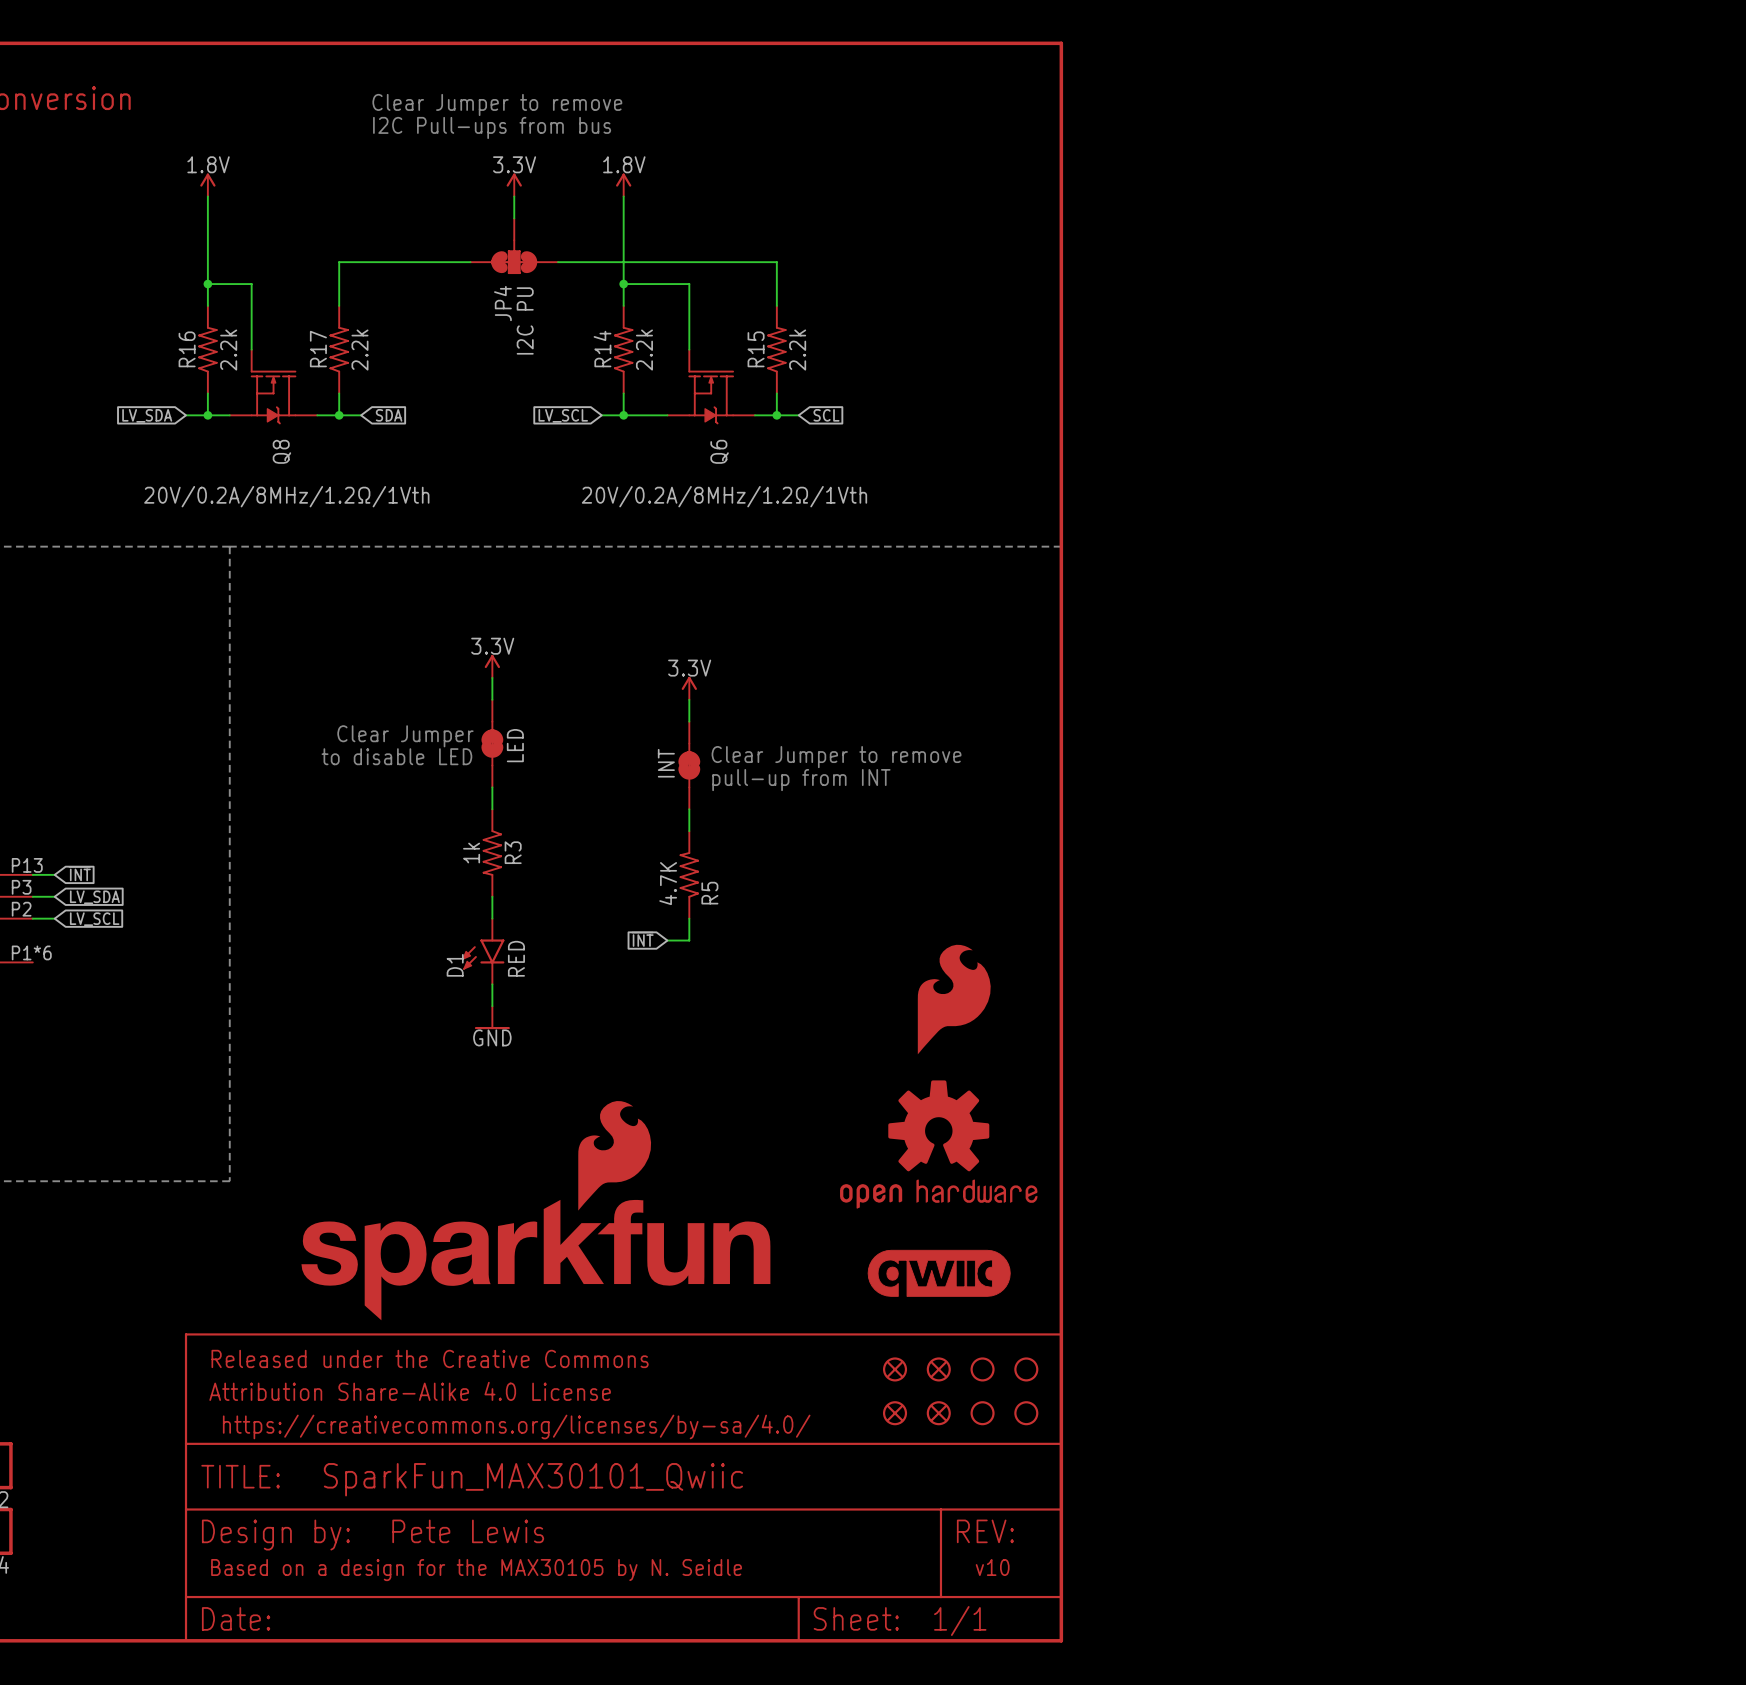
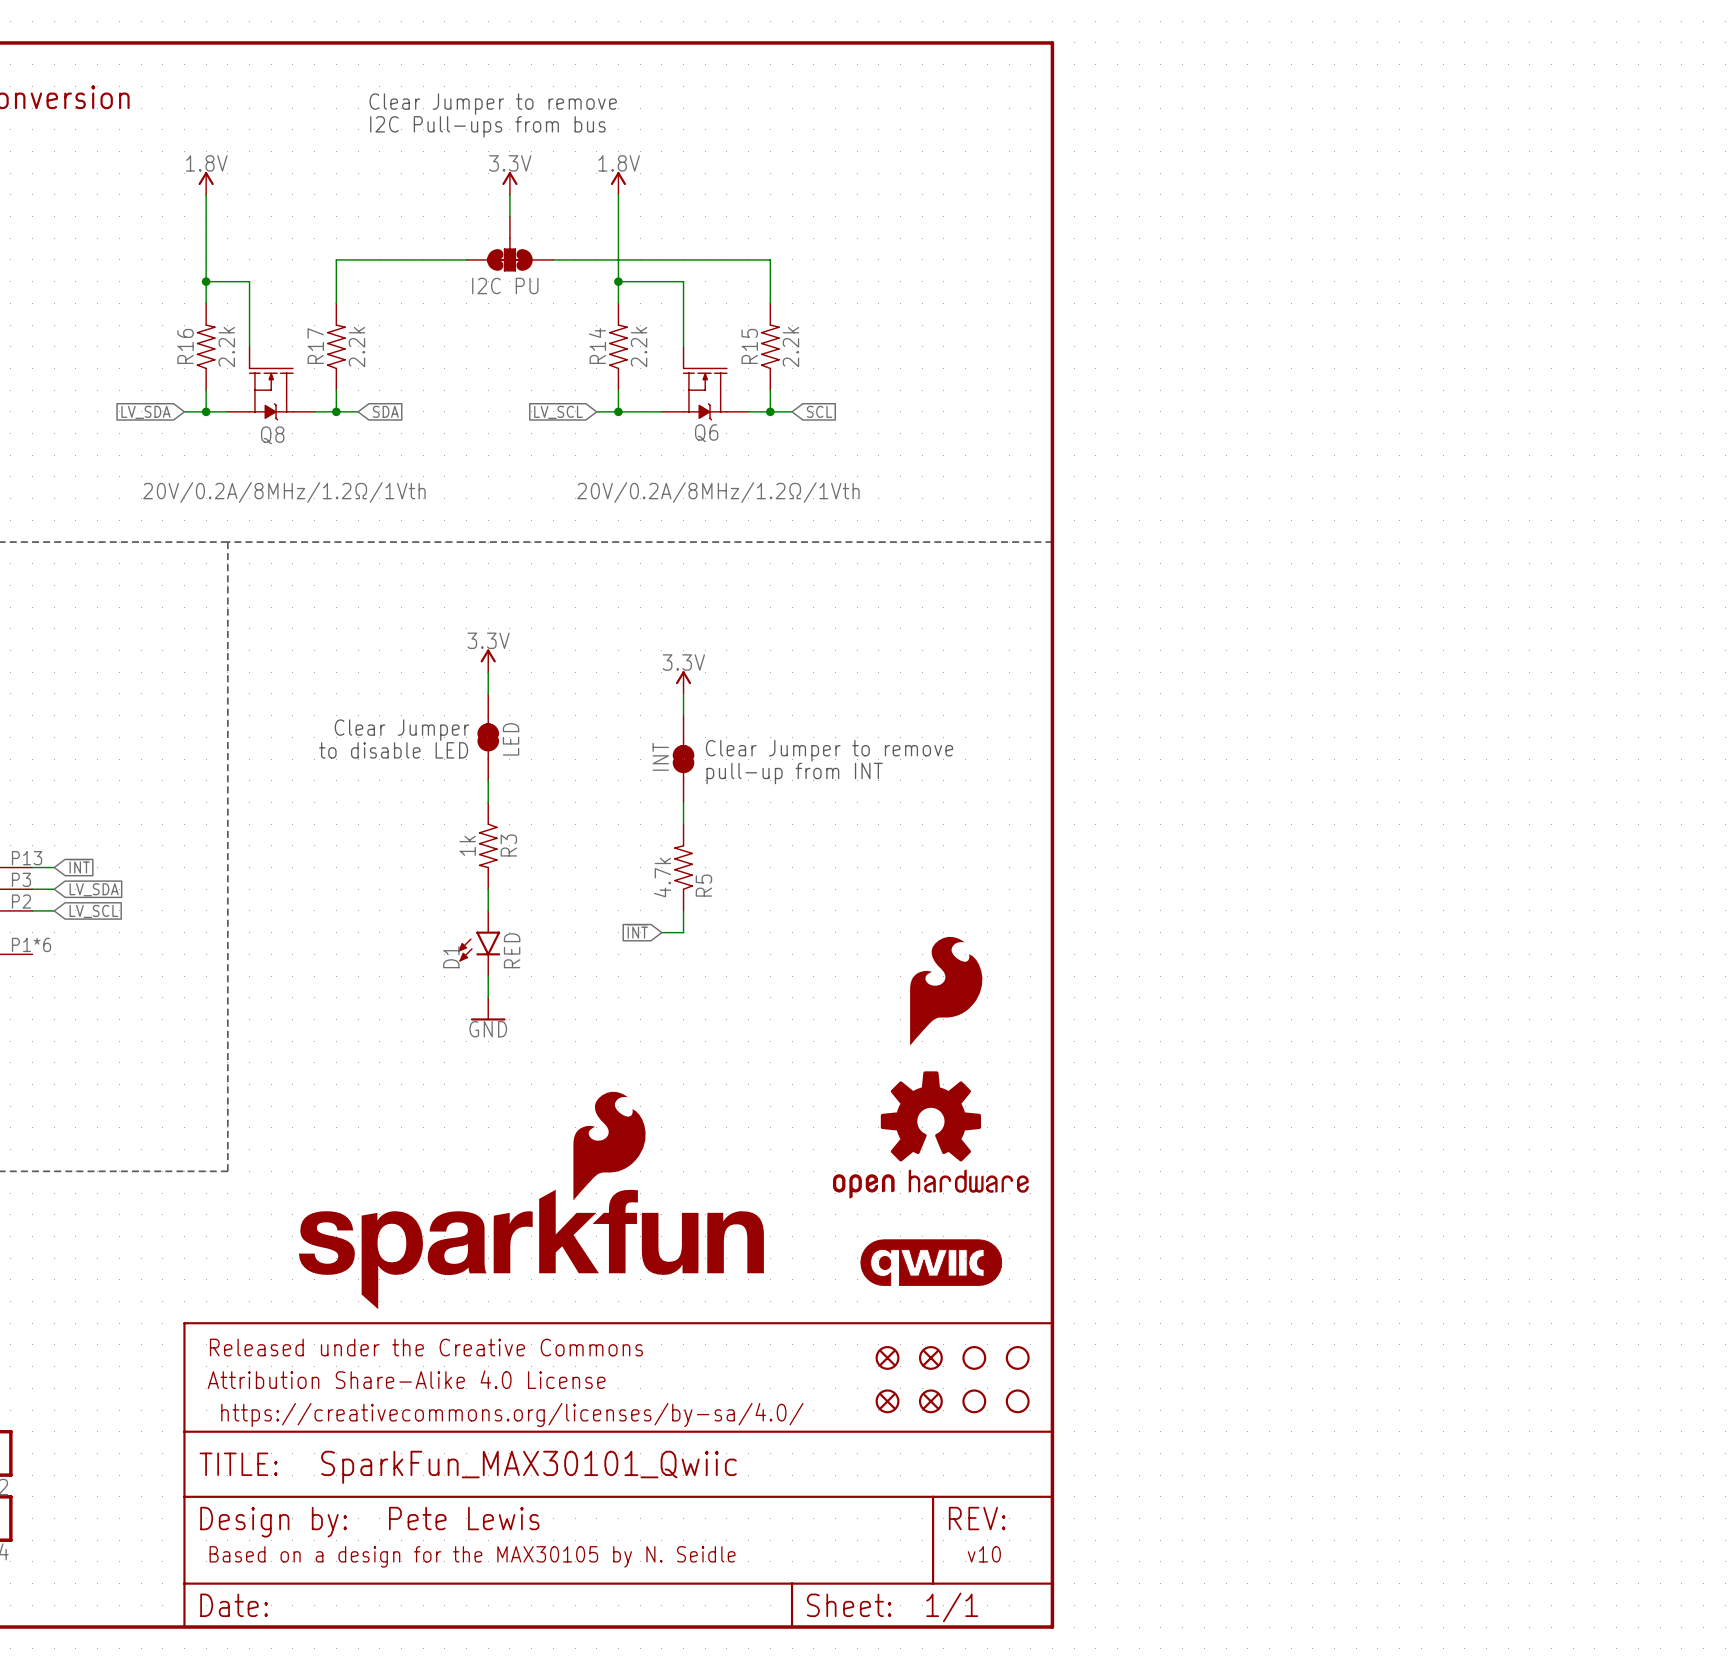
JP4 name: JP4 (502, 303) -> none
JP4 value rotation: 0° (525, 320) -> 90° clockwise (505, 286)
Q8 name rotation: 0° (281, 451) -> 90° clockwise (272, 435)
Q6 name rotation: 0° (719, 451) -> 90° clockwise (706, 433)
R5 value: 4.7K (668, 883) -> 4.7k (662, 877)

